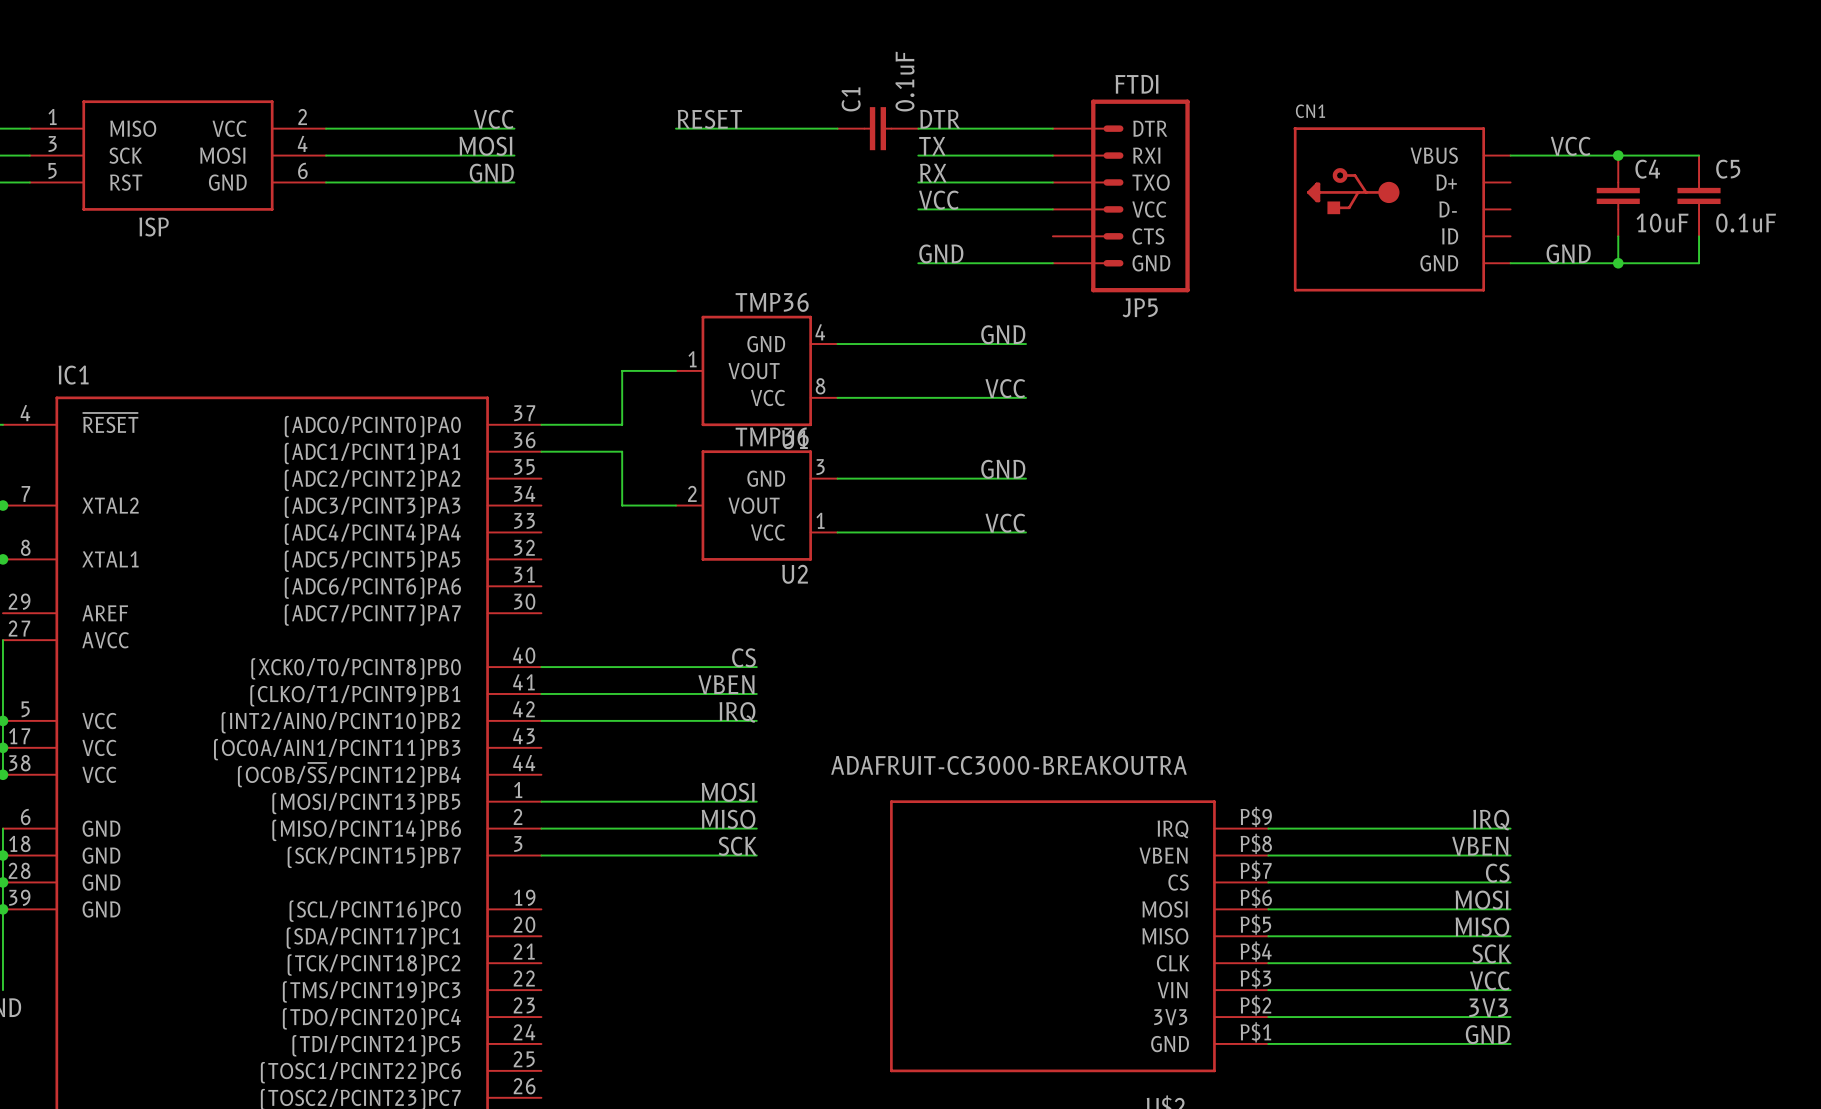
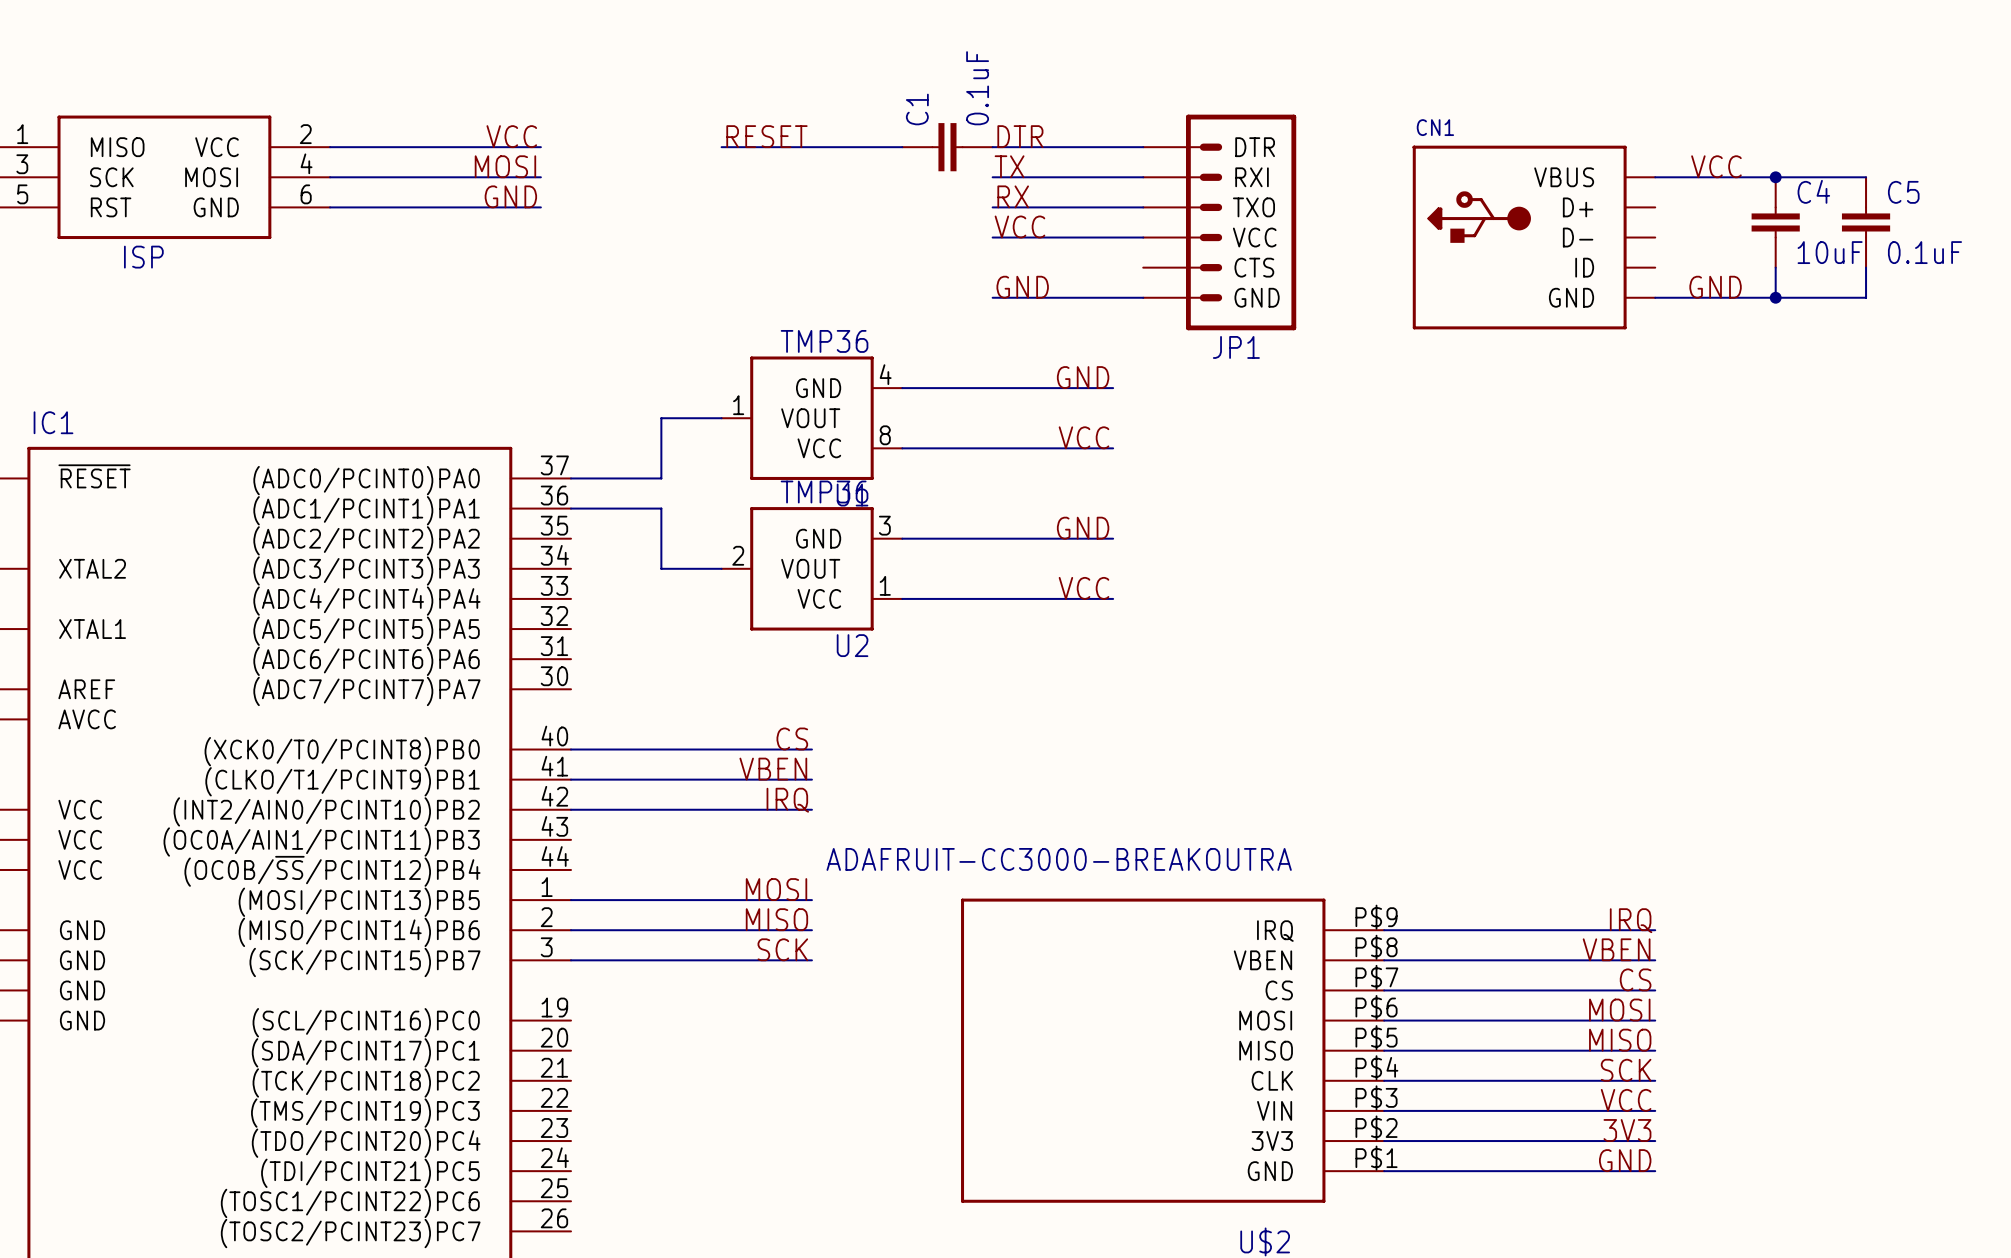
JP5 value: FTDI (1136, 84) -> none
JP5 name: JP5 (1140, 307) -> JP1 (1236, 347)

